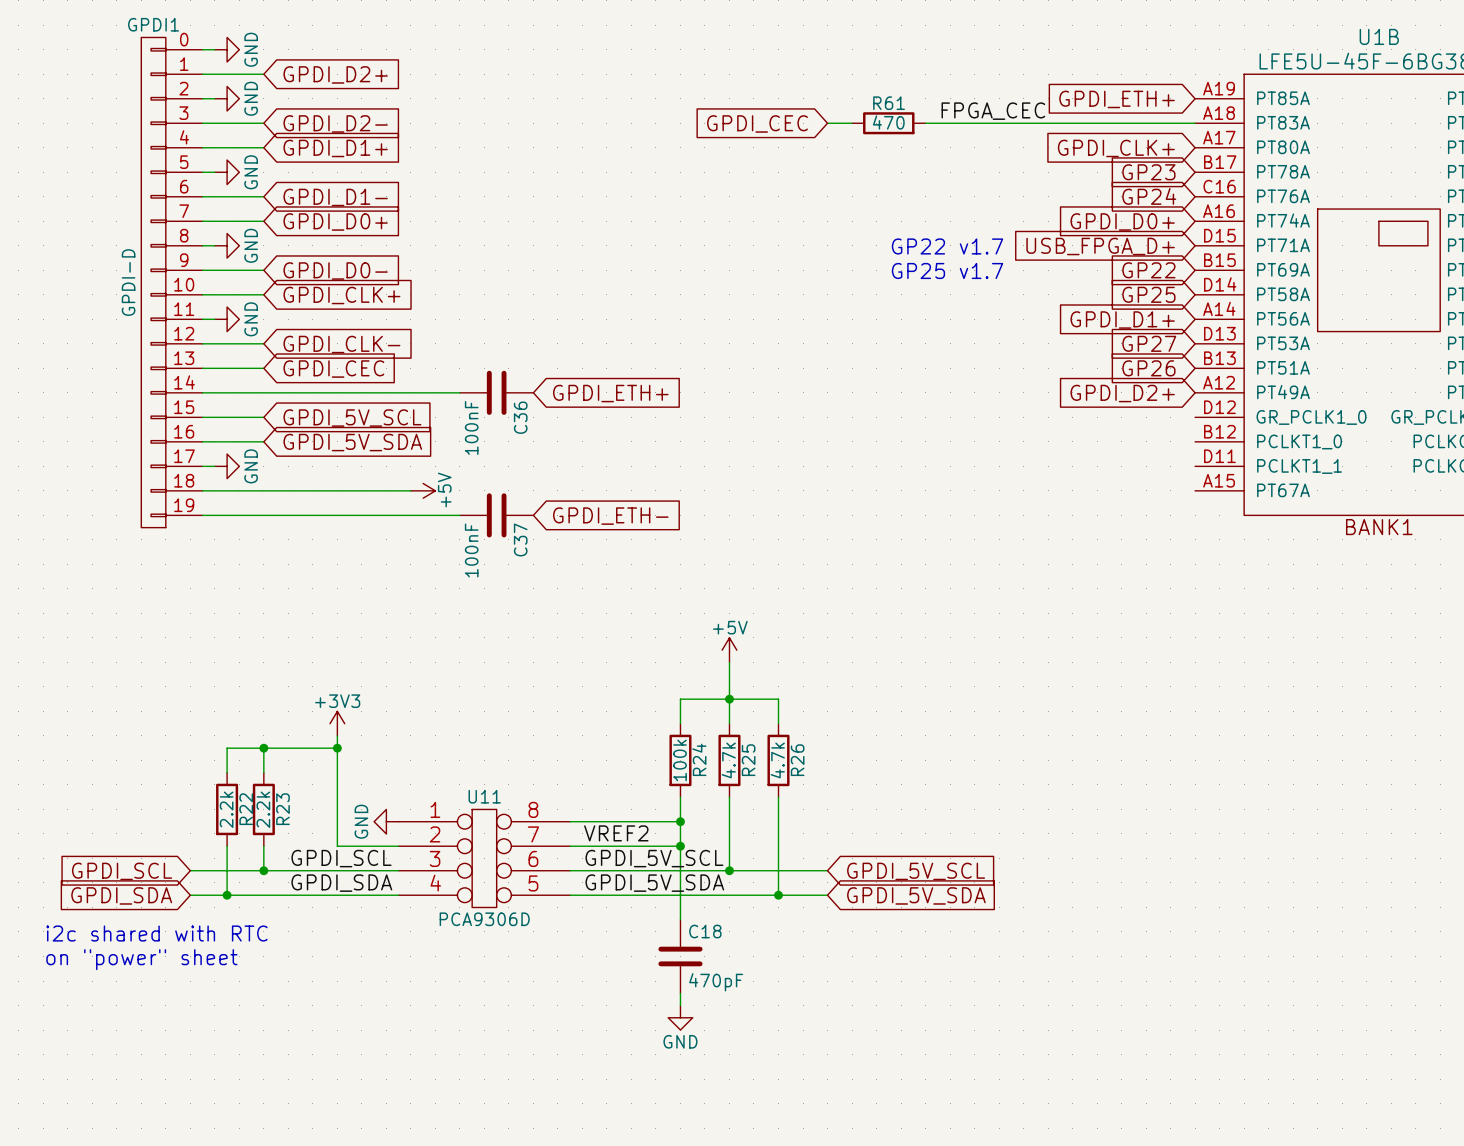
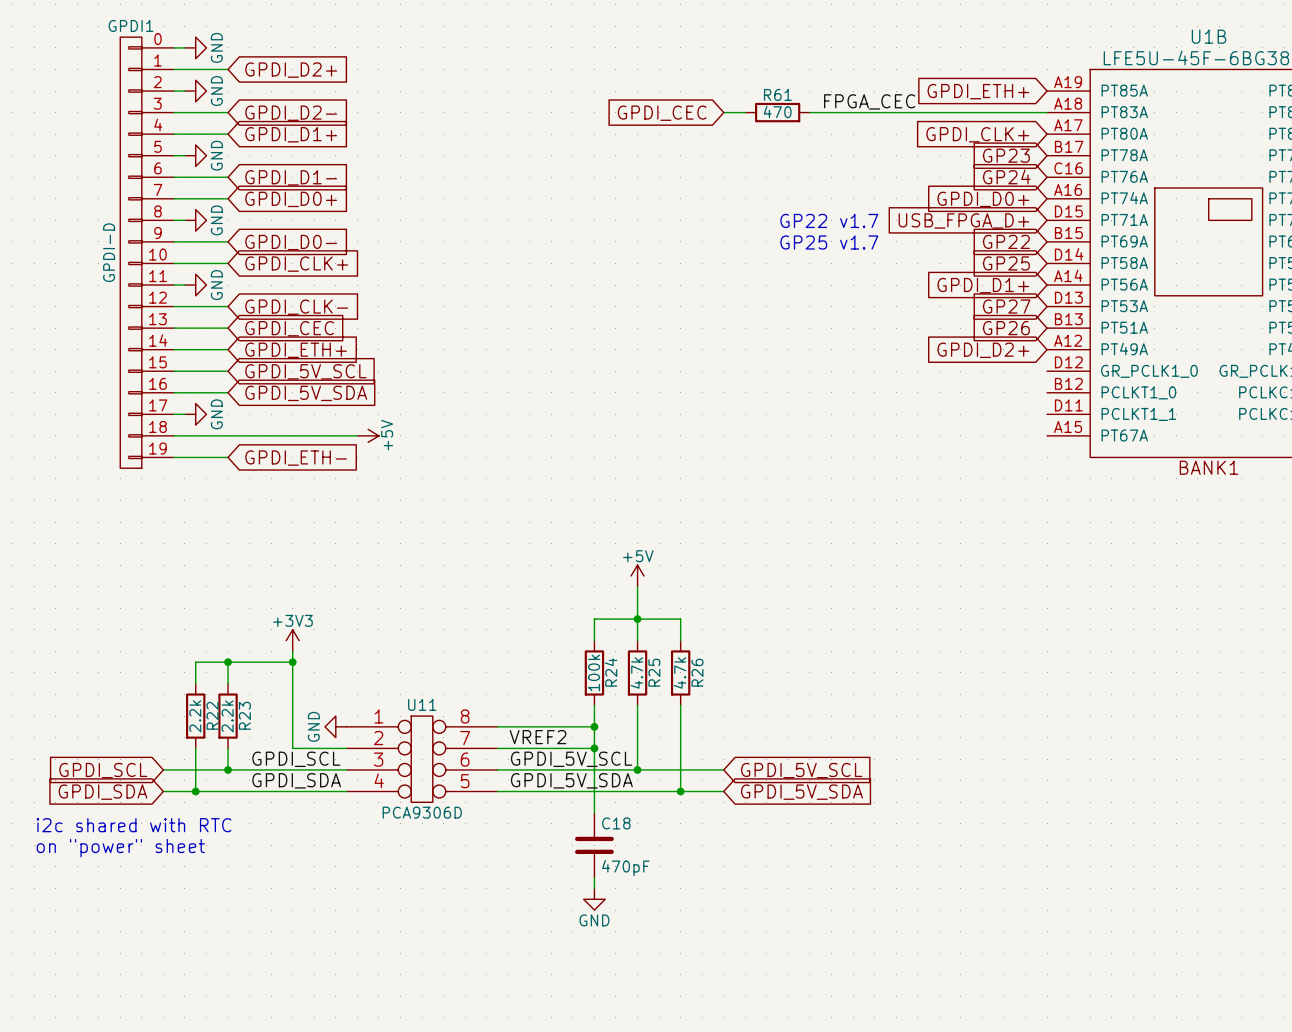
wire: (263, 392) (459, 392) -> none
C36: 100nF (496, 392) -> none
global label: none -> GPDI_ETH+ (296, 350)
global label: GPDI_ETH+ (610, 393) -> none
wire: (263, 515) (459, 515) -> none
C37: 100nF (496, 515) -> none
global label: none -> GPDI_ETH- (296, 458)
global label: GPDI_ETH- (610, 516) -> none

